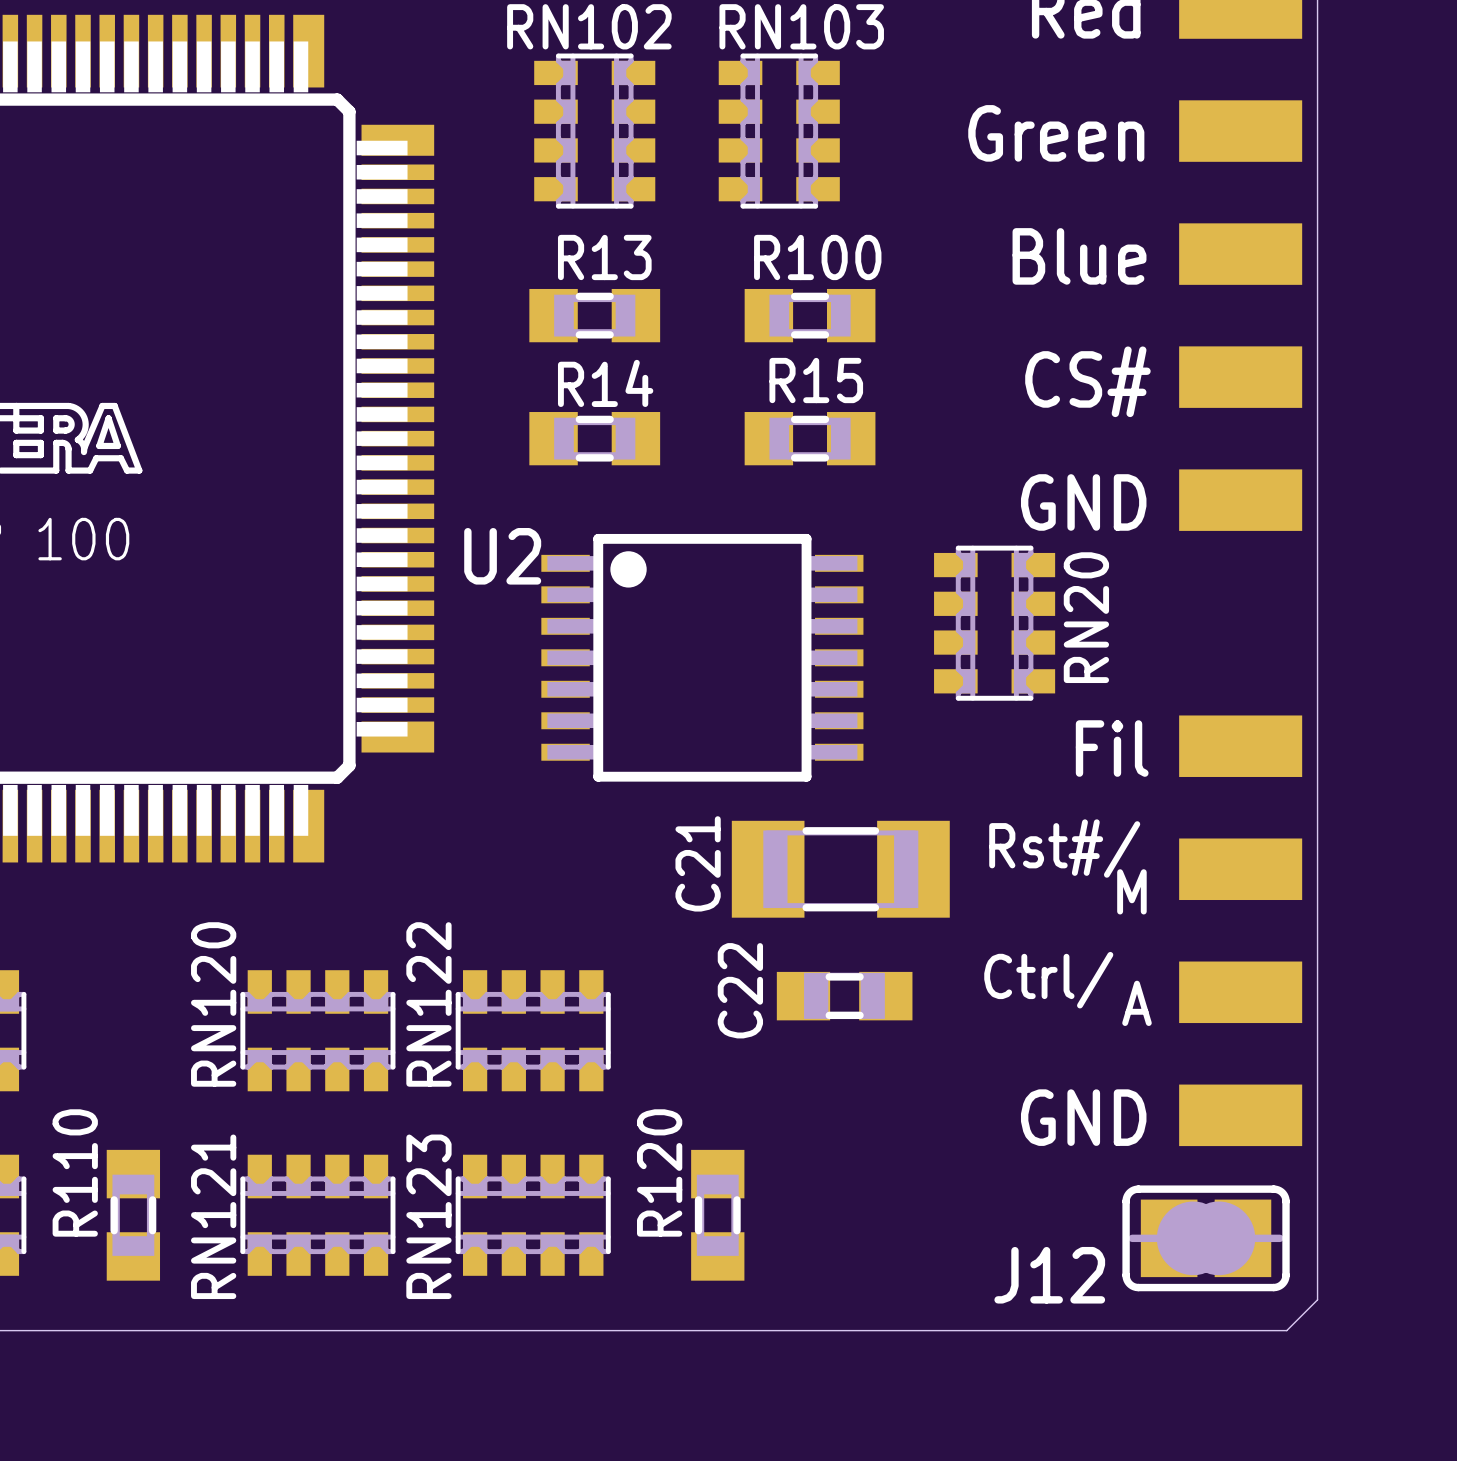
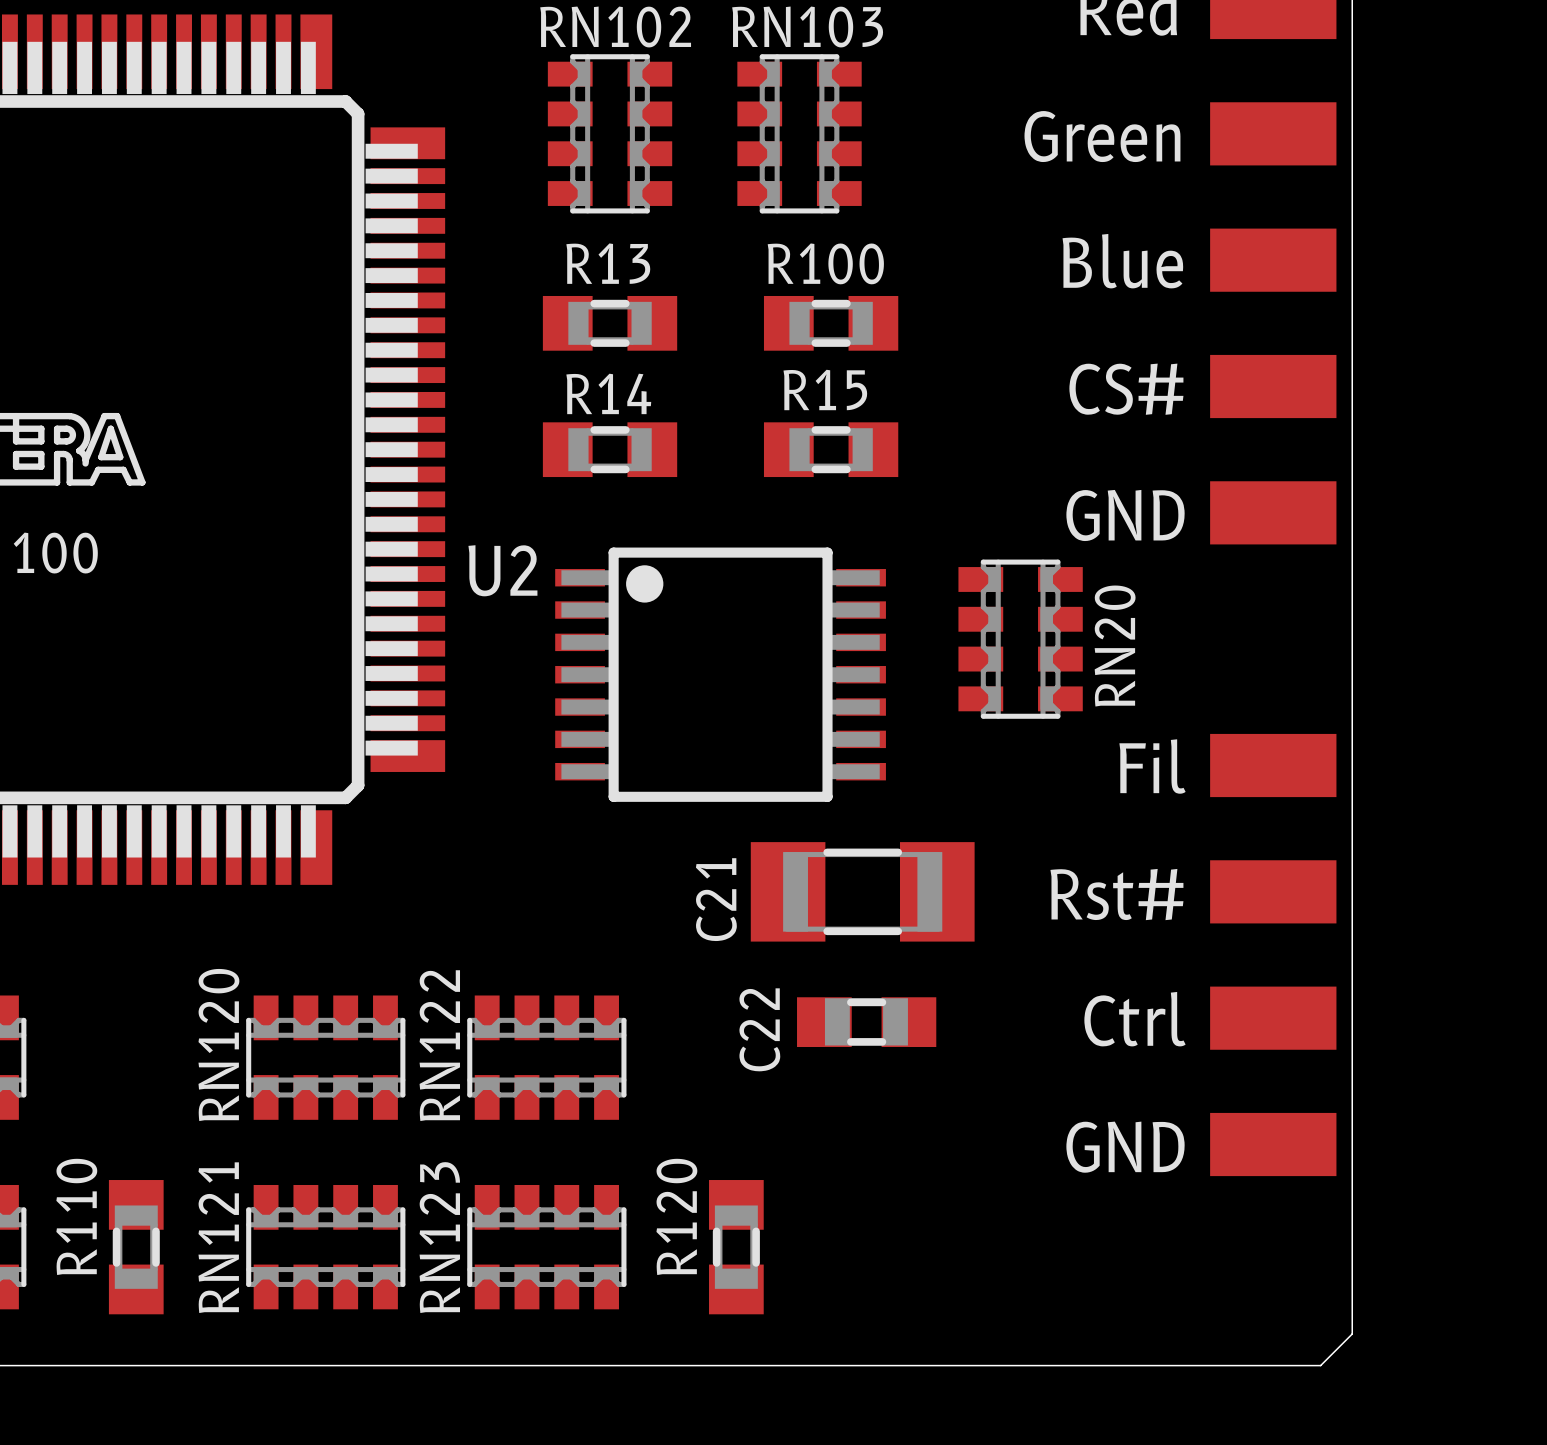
text: Rst#/ (1064, 848) -> none
text: M (1131, 891) -> Rst# (1116, 894)
text: Ctrl/ (1048, 980) -> none
text: A (1137, 1003) -> Ctrl (1134, 1019)
part: (1206, 1238) -> none
text: J12 (1049, 1275) -> none

